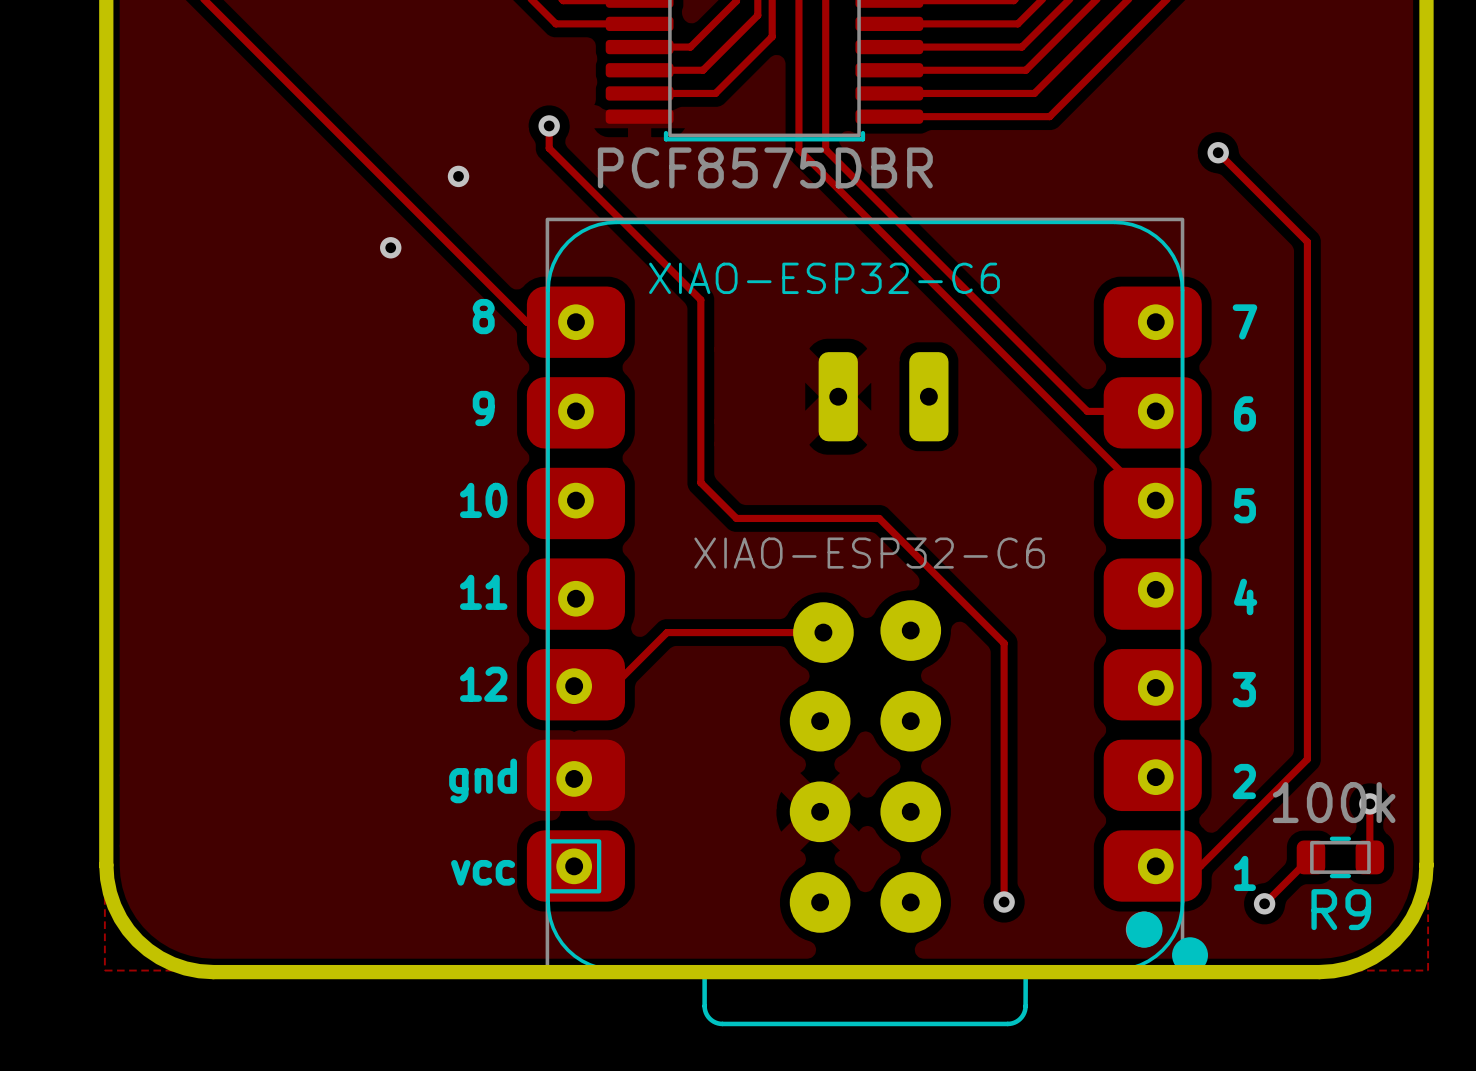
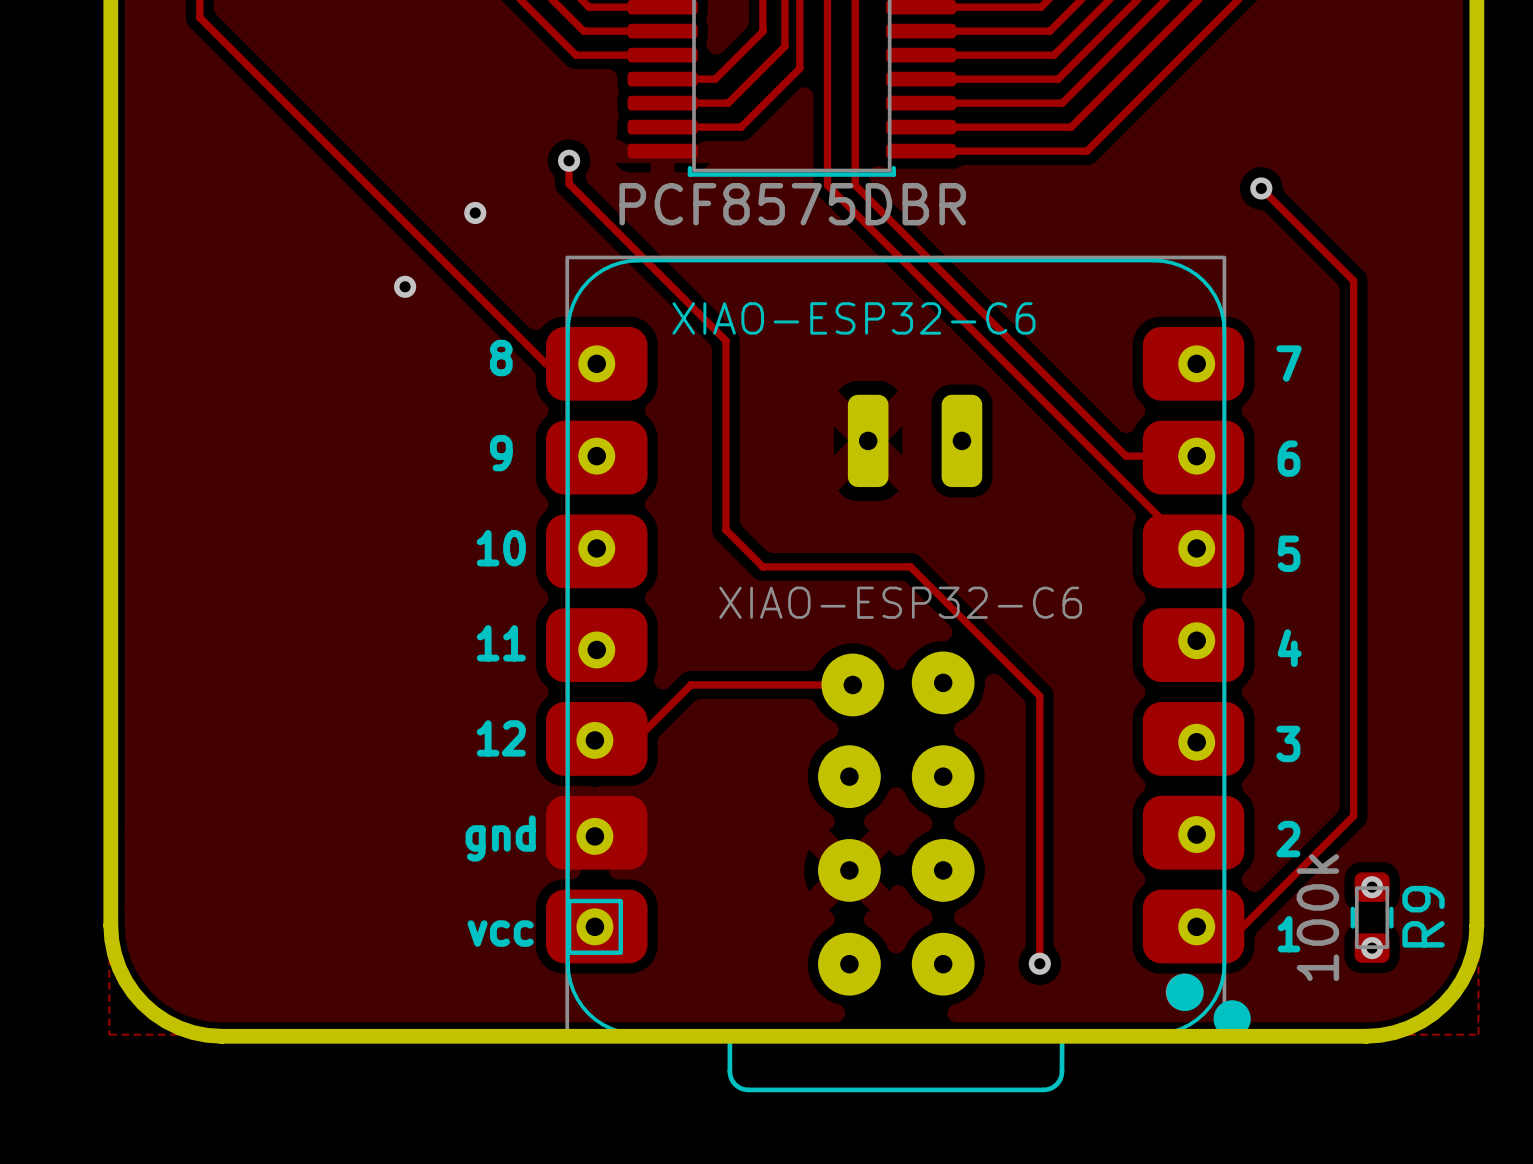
track: (1369, 803) (1369, 857) -> none
via: (1369, 803) -> none
via: none -> (1372, 887)
track: (1310, 857) (1264, 903) -> none
R9 rotation: 0° (1340, 857) -> 90° clockwise (1372, 917)
via: none -> (1372, 948)
via: (1264, 903) -> none
R9 name position: R9 (1341, 909) -> R9 (1423, 916)

